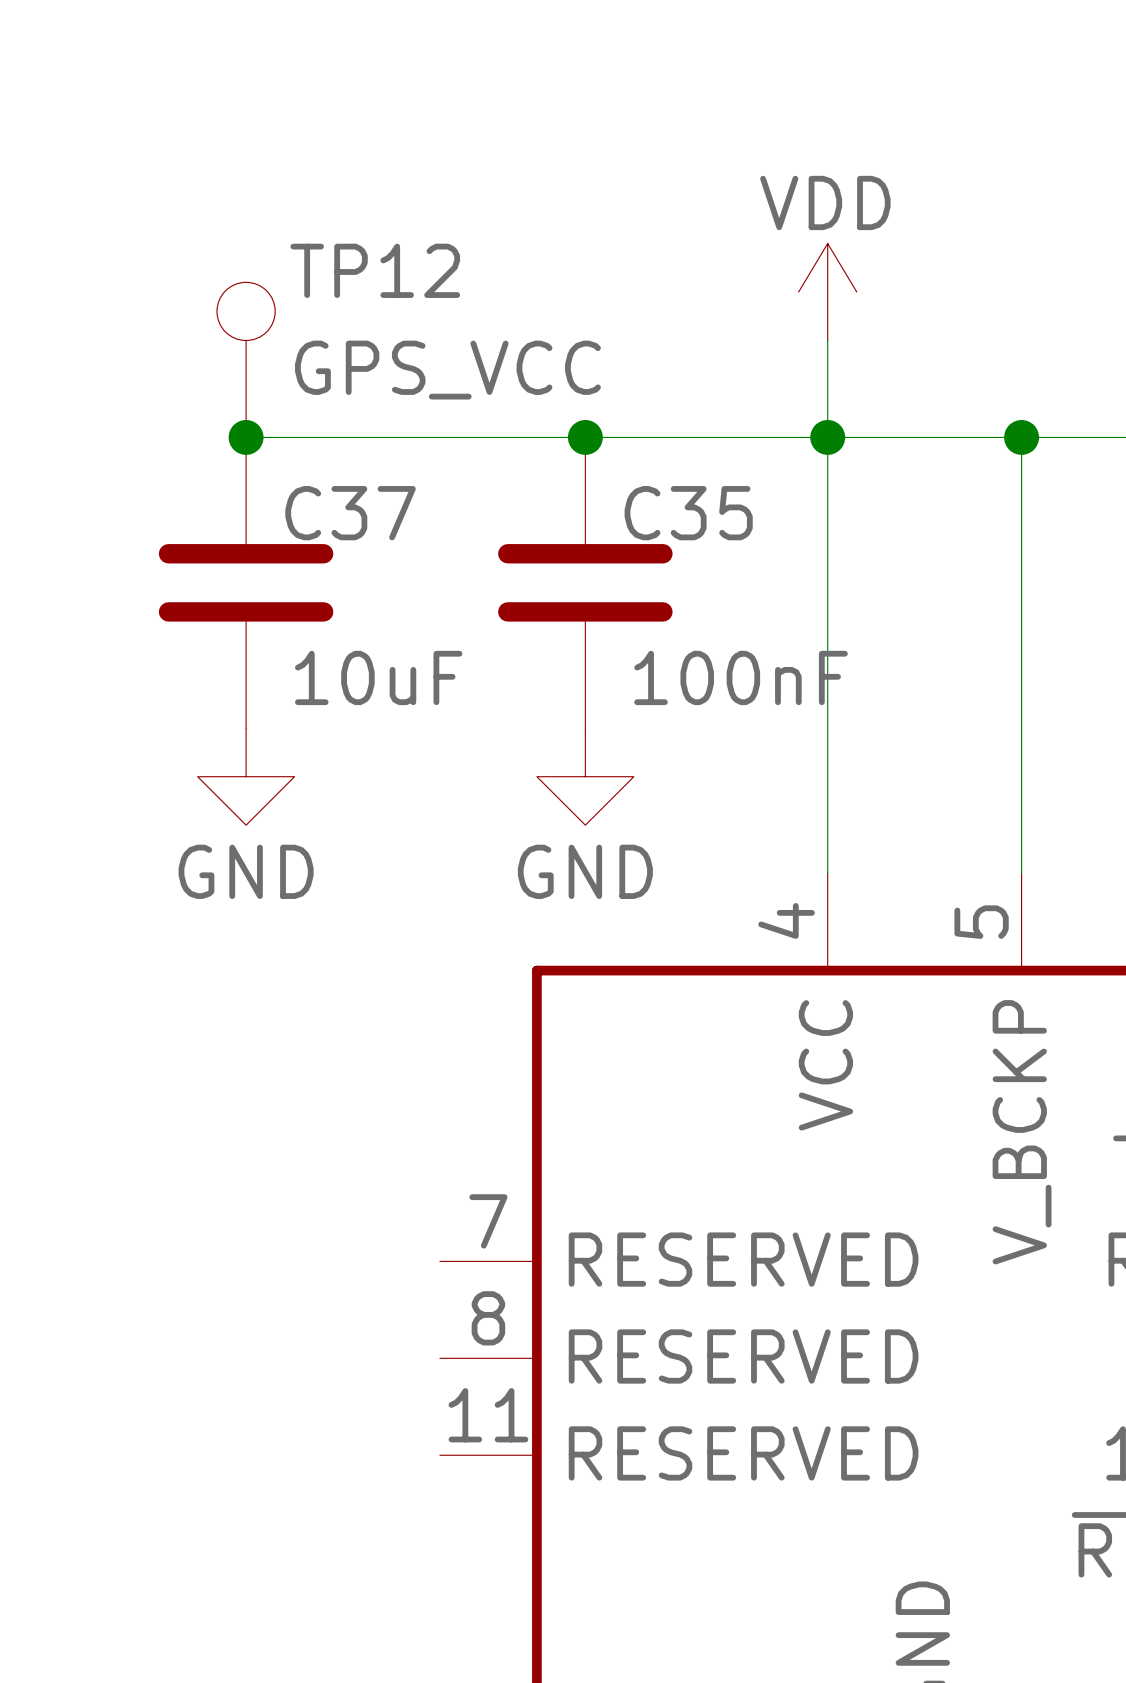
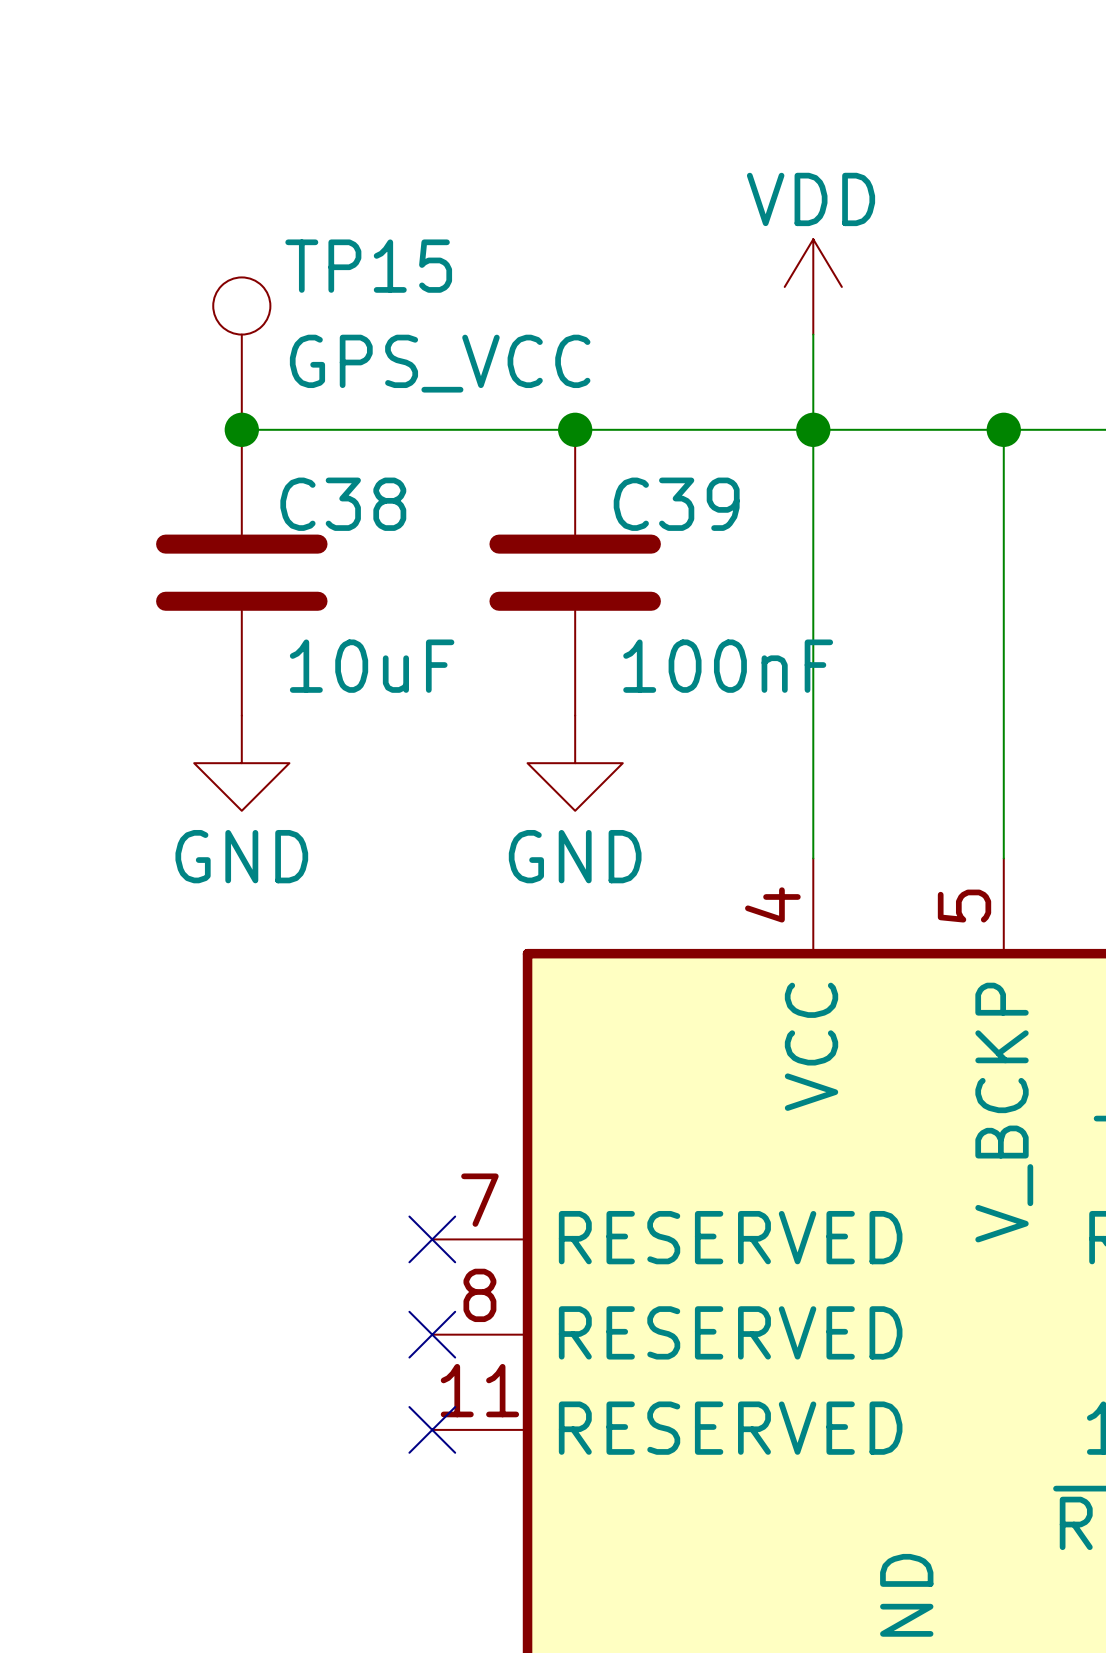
TP12 name: TP12 (375, 270) -> TP15 (368, 266)
C37 name: C37 (350, 513) -> C38 (343, 504)
C35 name: C35 (688, 513) -> C39 (676, 504)
no-connect mark: none -> (432, 1239)
no-connect mark: none -> (432, 1334)
no-connect mark: none -> (432, 1429)

